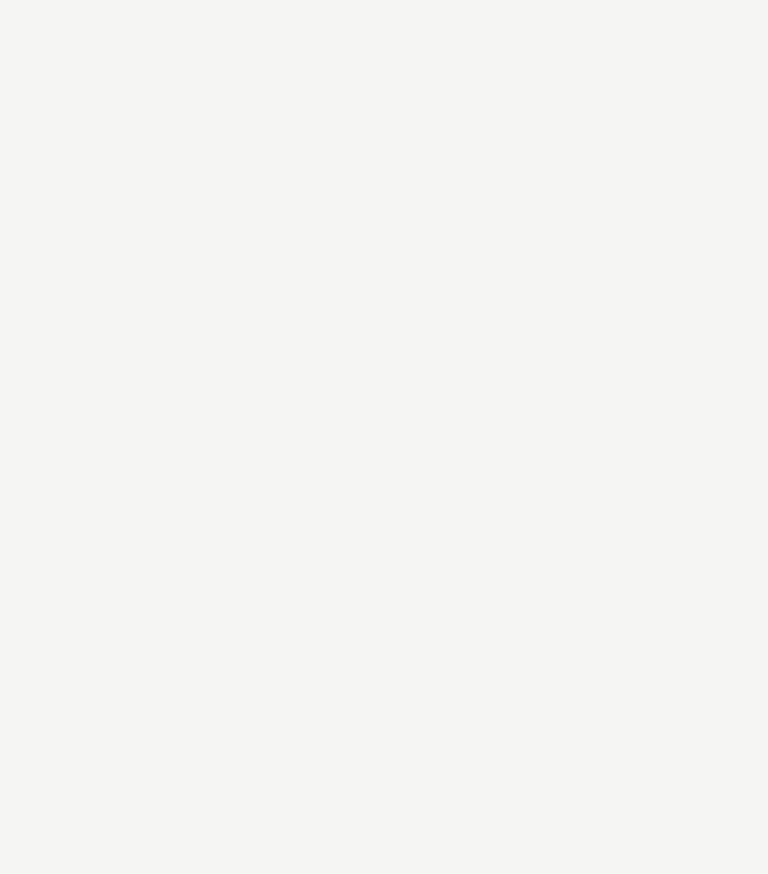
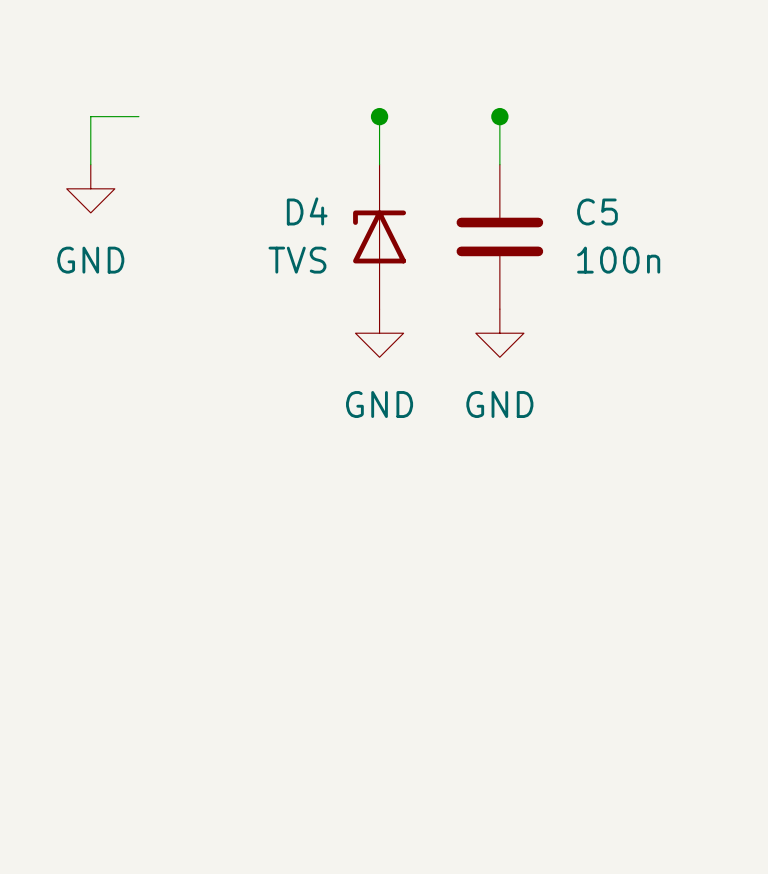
wire: none -> (138, 116) (90, 116) (90, 164)
wire: none -> (379, 116) (379, 164)
junction: none -> (379, 116)
wire: none -> (499, 116) (499, 164)
junction: none -> (499, 116)
power symbol: none -> GND (90, 188)
D4: none -> TVS (379, 236)
C5: none -> 100n (499, 236)
power symbol: none -> GND (379, 333)
power symbol: none -> GND (499, 333)

